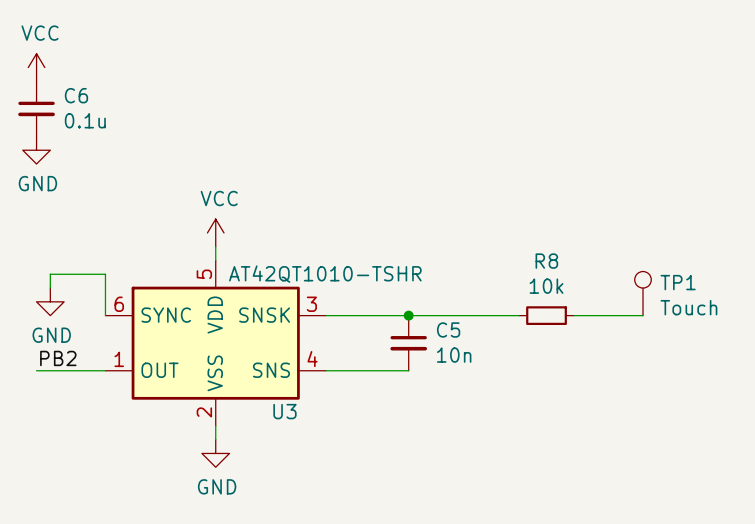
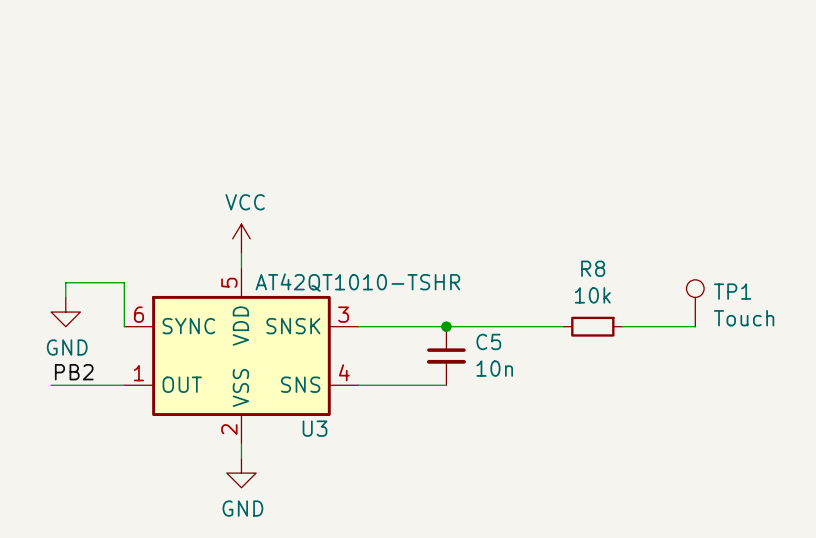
power symbol: VCC (36, 67) -> none
C6: 0.1u (36, 108) -> none
power symbol: GND (36, 150) -> none

